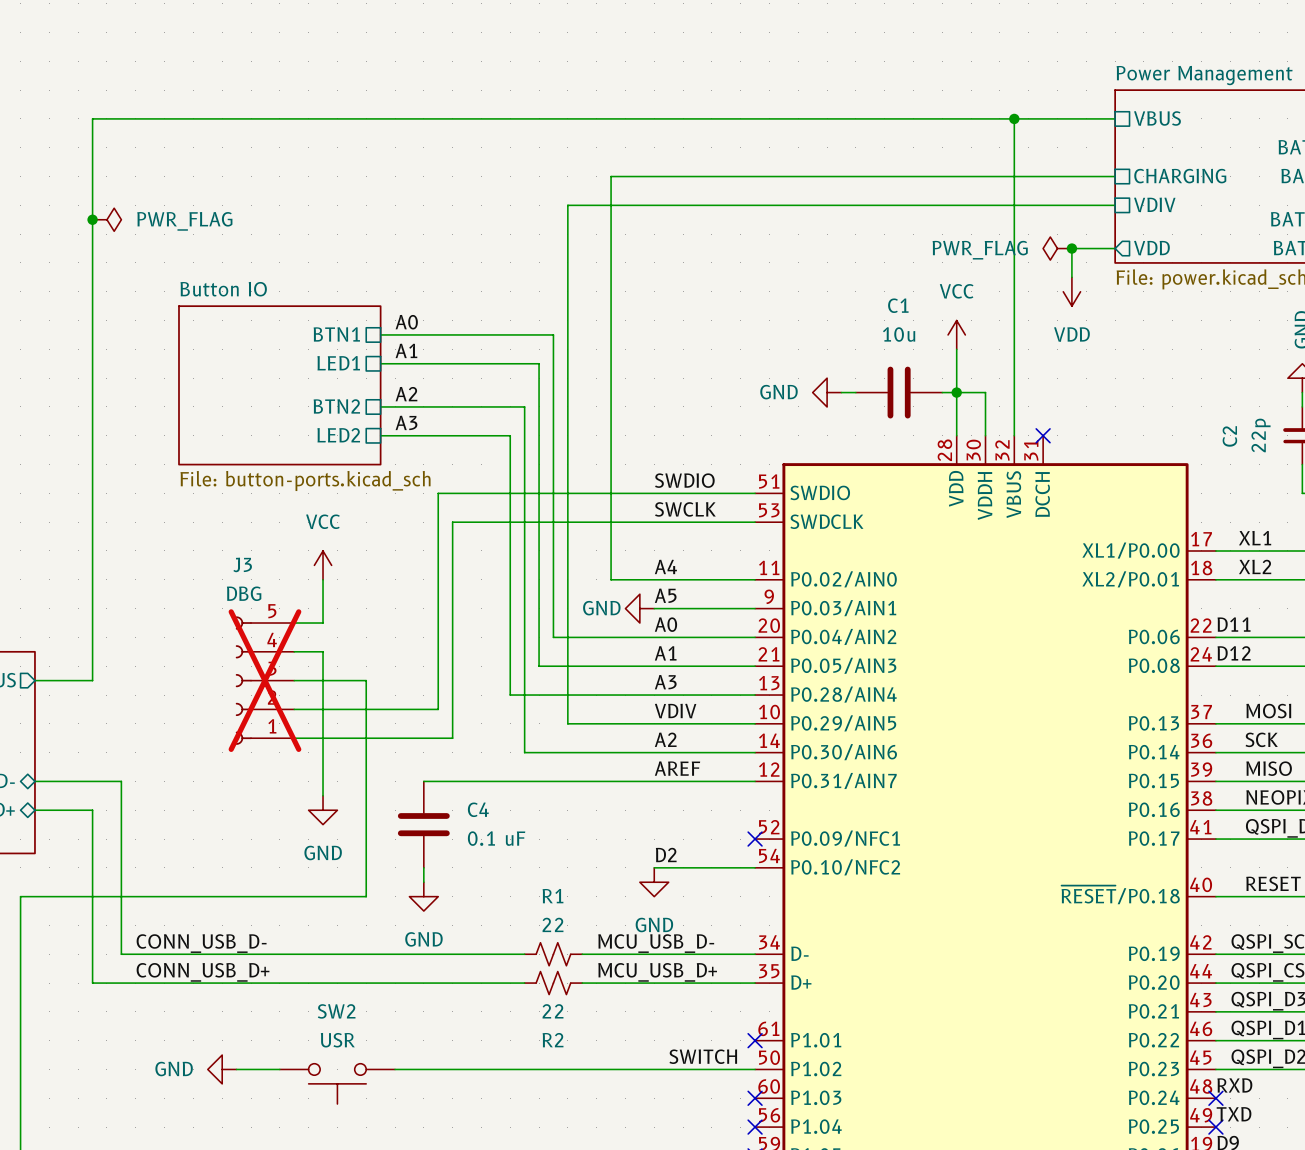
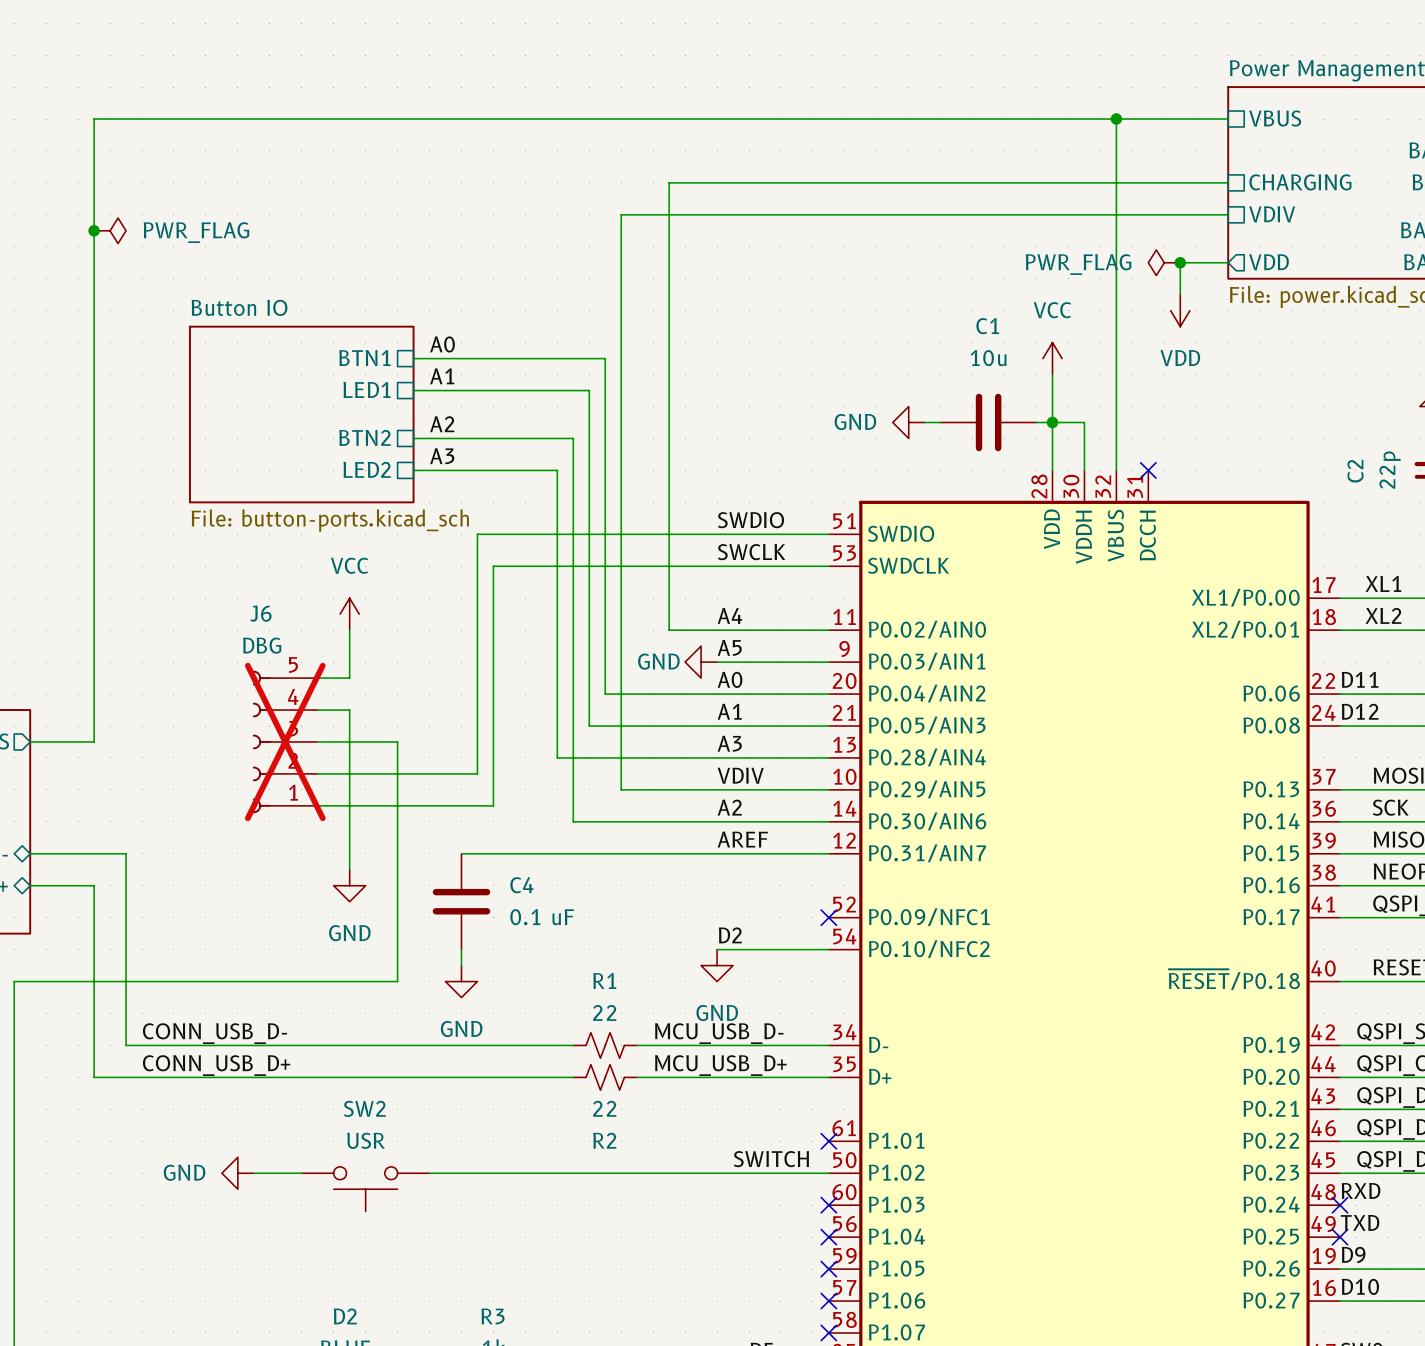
J3 name: J3 (242, 564) -> J6 (260, 613)

